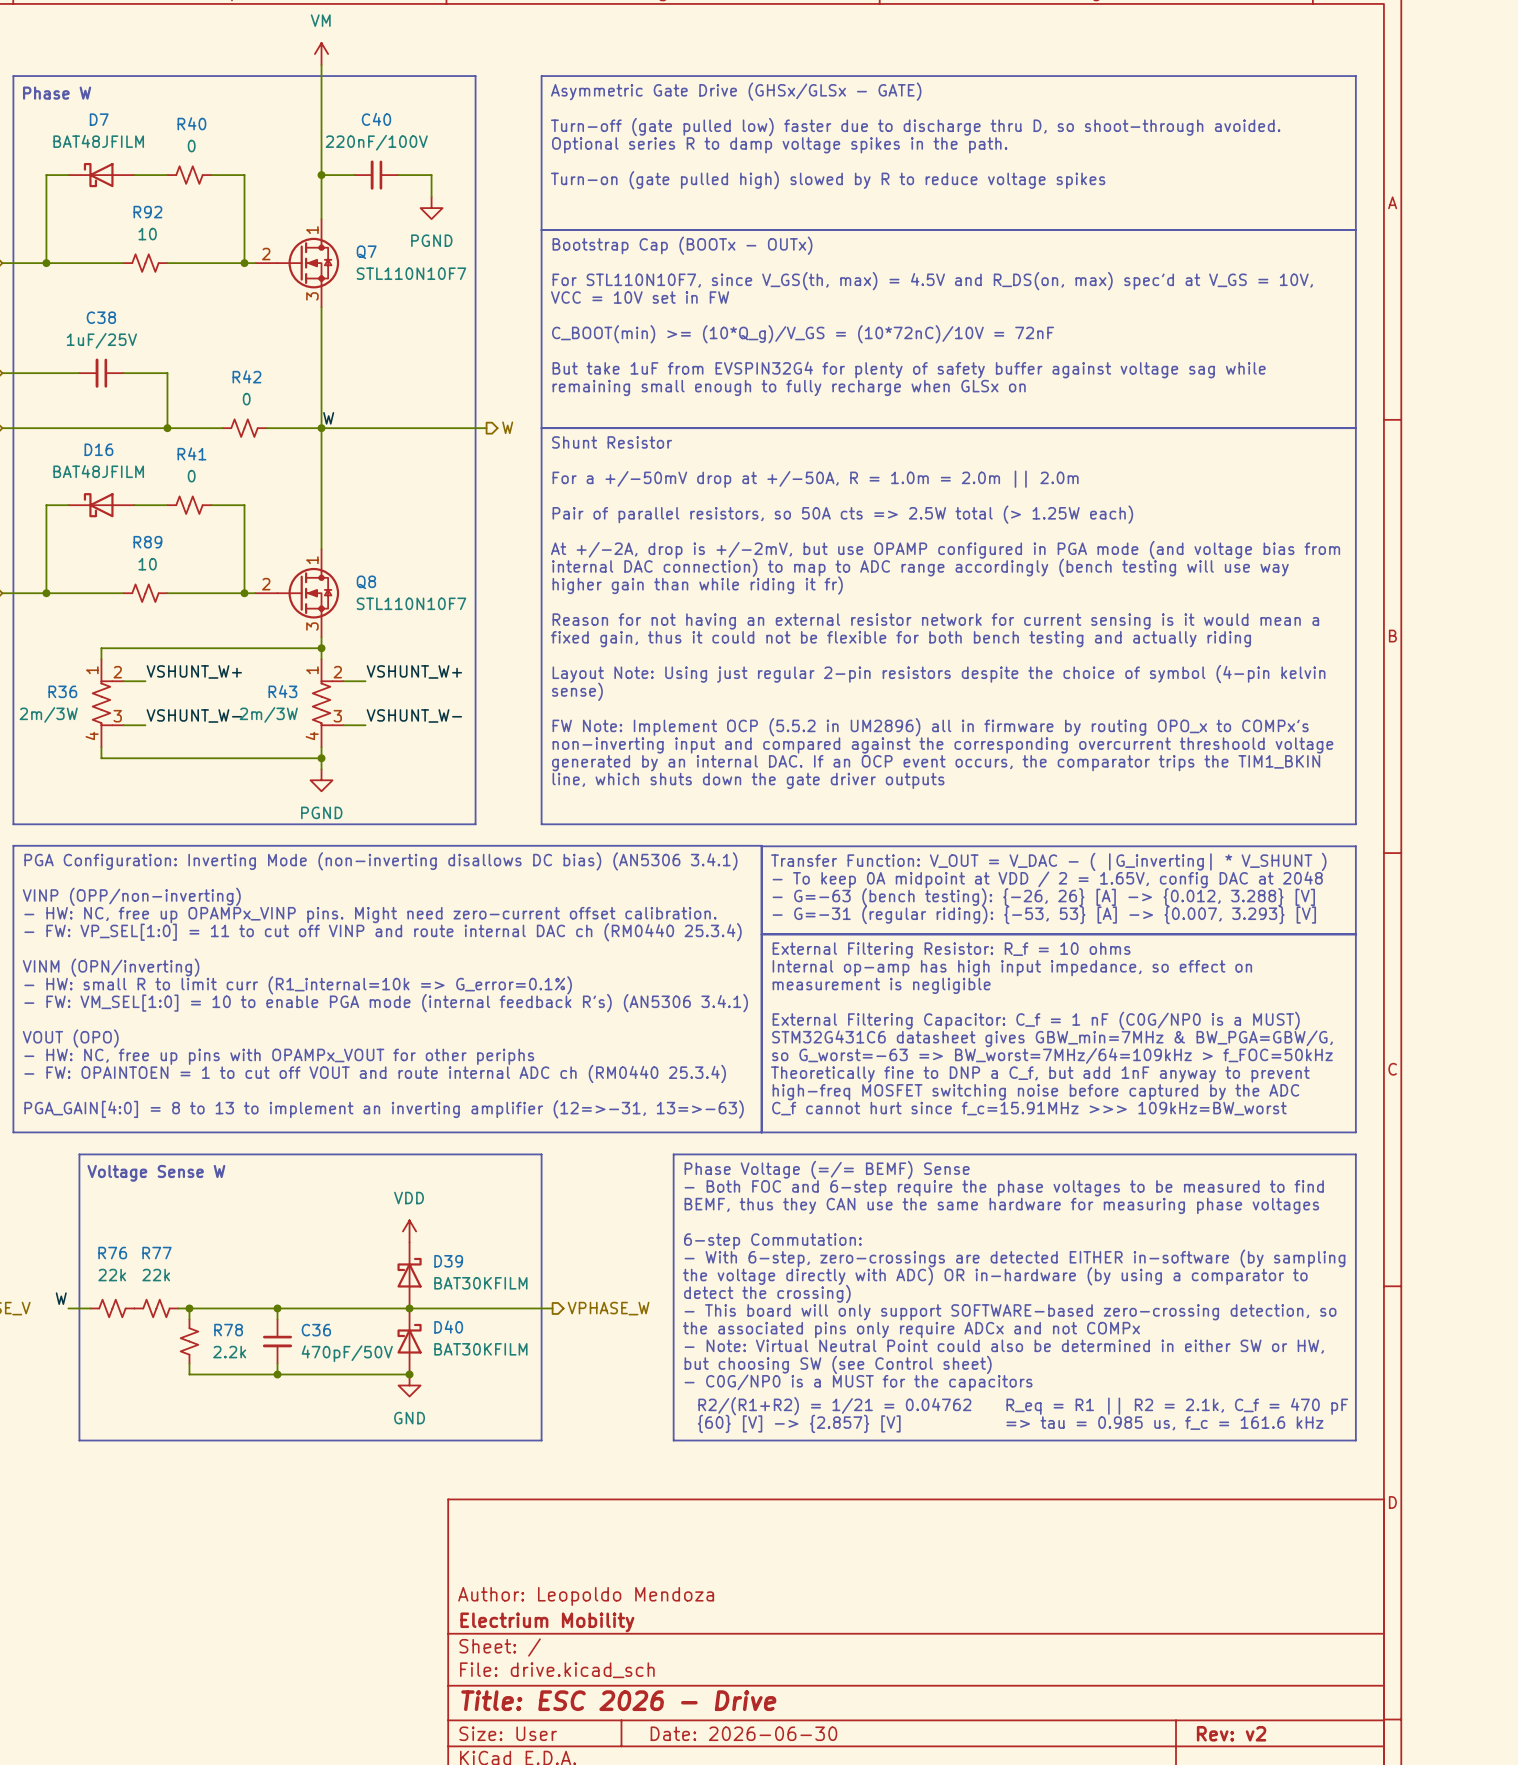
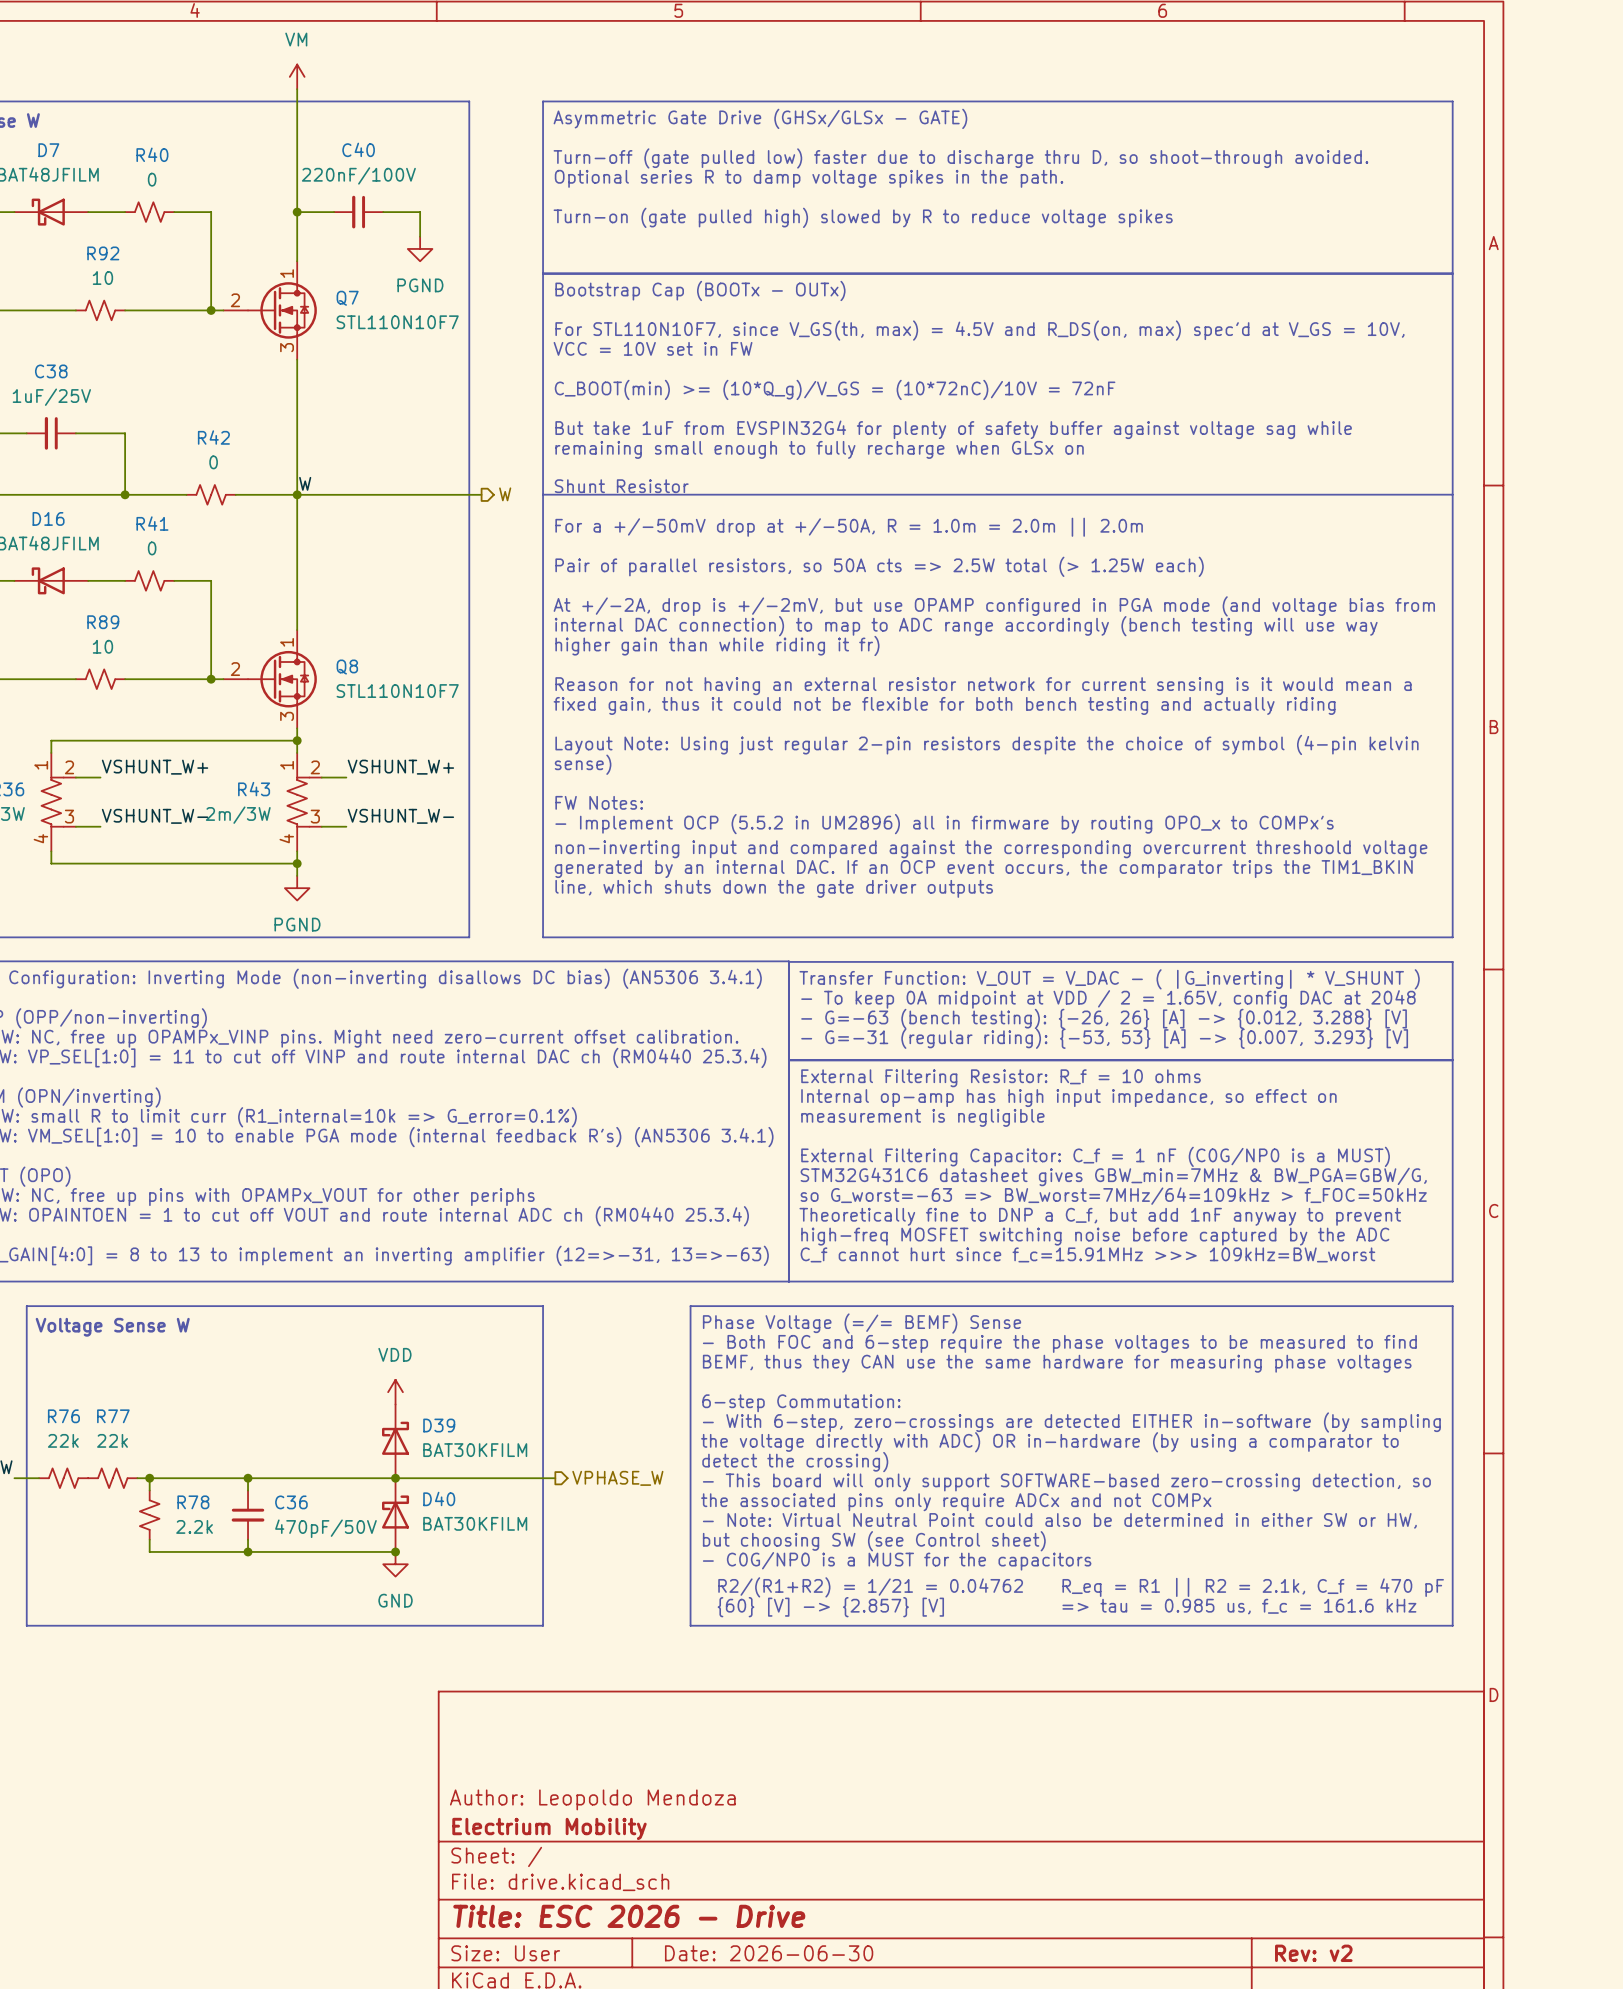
text position: Shunt Resistor (612, 442) -> Shunt Resistor (621, 486)
text position: For a +/-50mV drop at +/-50A, R = 1.0m = 2.0m || 2.0m (815, 479) -> For a +/-50mV drop at +/-50A, R = 1.0m = 2.0m || 2.0m (849, 527)
text position: Pair of parallel resistors, so 50A cts => 2.5W total (> 1.25W each) (842, 514) -> Pair of parallel resistors, so 50A cts => 2.5W total (> 1.25W each) (879, 566)
text position: At +/-2A, drop is +/-2mV, but use OPAMP configured in PGA mode (and voltage bias from (945, 550) -> At +/-2A, drop is +/-2mV, but use OPAMP configured in PGA mode (and voltage bias from (994, 606)
text position: internal DAC connection) to map to ADC range accordingly (bench testing will use way (920, 567) -> internal DAC connection) to map to ADC range accordingly (bench testing will use way (966, 626)
text position: higher gain than while riding it fr) (697, 585) -> higher gain than while riding it fr) (717, 645)
text position: Reason for not having an external resistor network for current sensing is it would mean a (935, 621) -> Reason for not having an external resistor network for current sensing is it would mean a (983, 686)
text position: fixed gain, thus it could not be flexible for both bench testing and actually riding (901, 639) -> fixed gain, thus it could not be flexible for both bench testing and actually riding (944, 705)
text position: Layout Note: Using just regular 2-pin resistors despite the choice of symbol (4-pin kelvin (938, 674) -> Layout Note: Using just regular 2-pin resistors despite the choice of symbol (4-pin kelvin (986, 744)
text position: sense) (577, 691) -> sense) (583, 764)
text: none -> FW Notes: (599, 802)
text: FW Note: Implement OCP (5.5.2 in UM2896) all in firmware by routing OPO_x to COMPx's (930, 727) -> - Implement OCP (5.5.2 in UM2896) all in firmware by routing OPO_x to COMPx's (944, 824)

